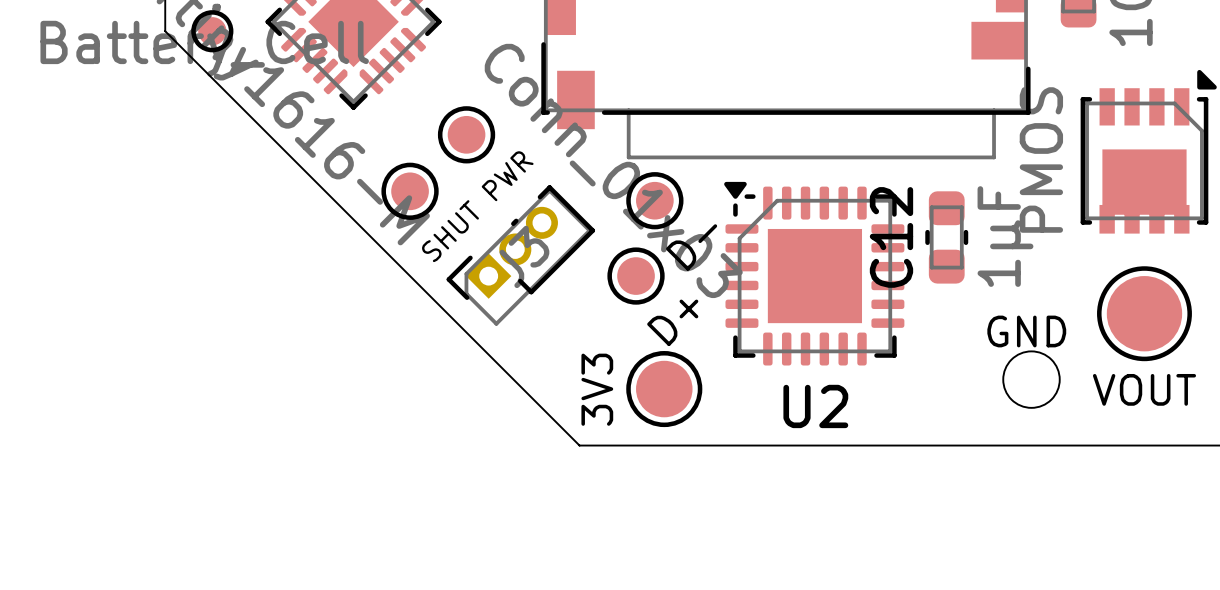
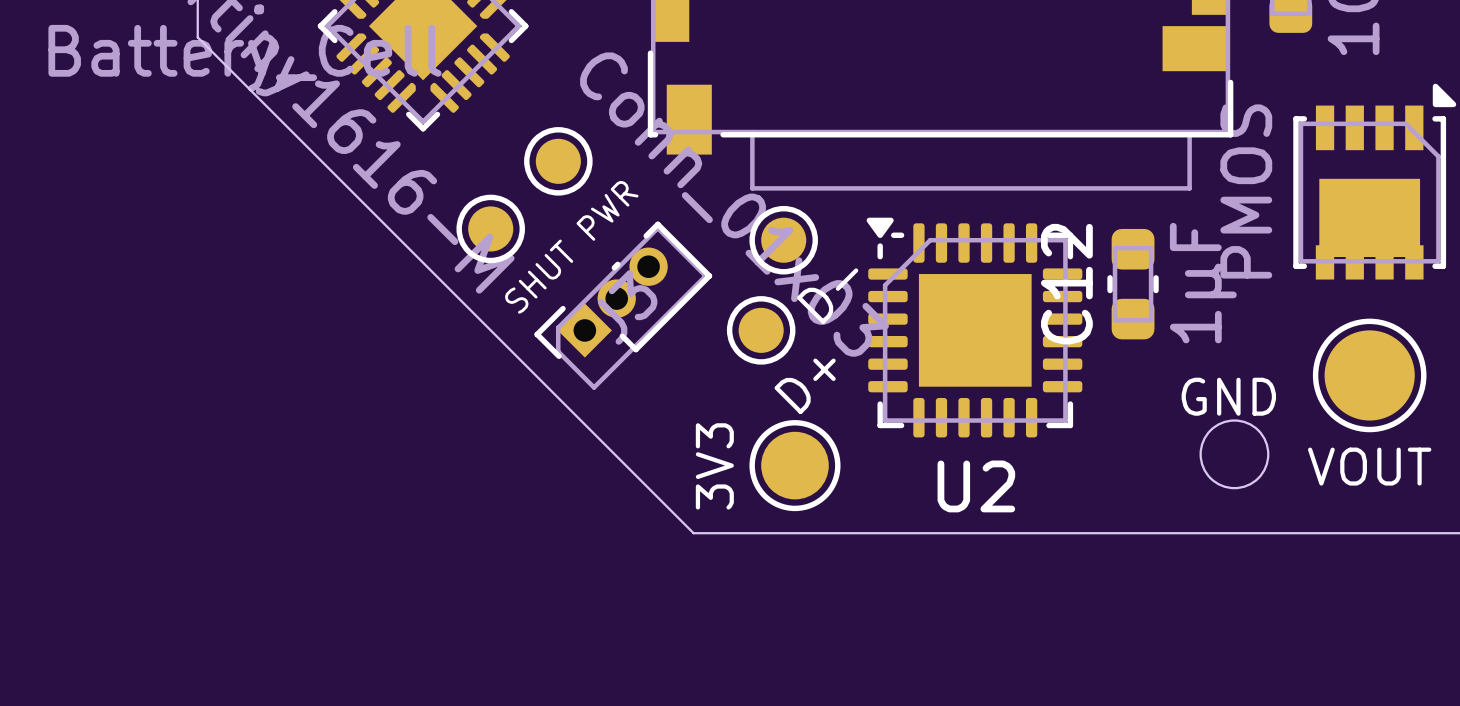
part: (212, 31) -> none

